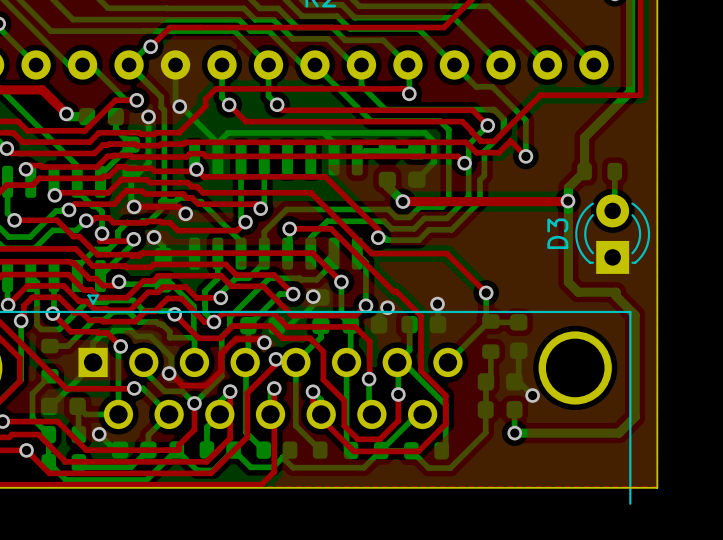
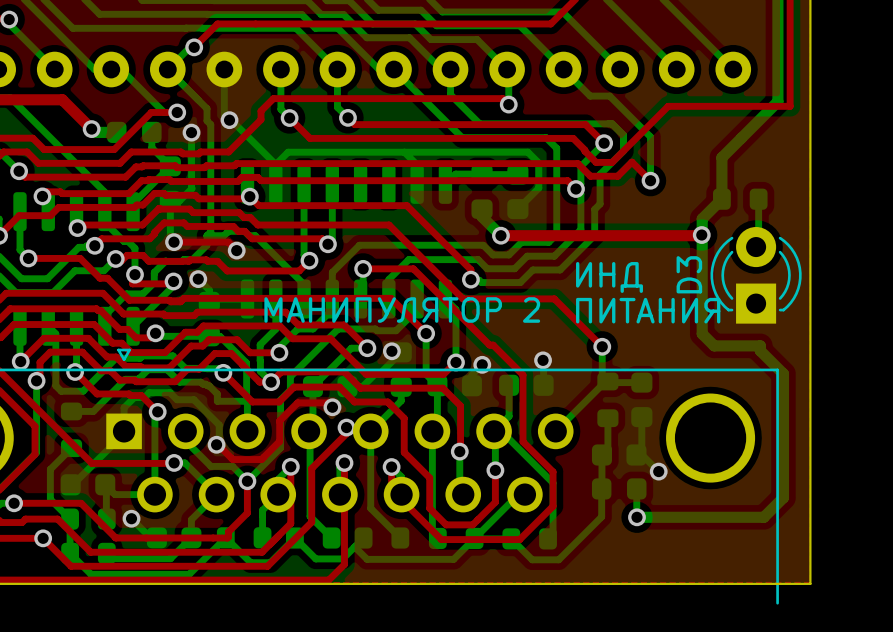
text: none -> ИНД (609, 277)
text: none -> МАНИПУЛЯТОР 2 (402, 309)
text: none -> ПИТАНИЯ (648, 310)

